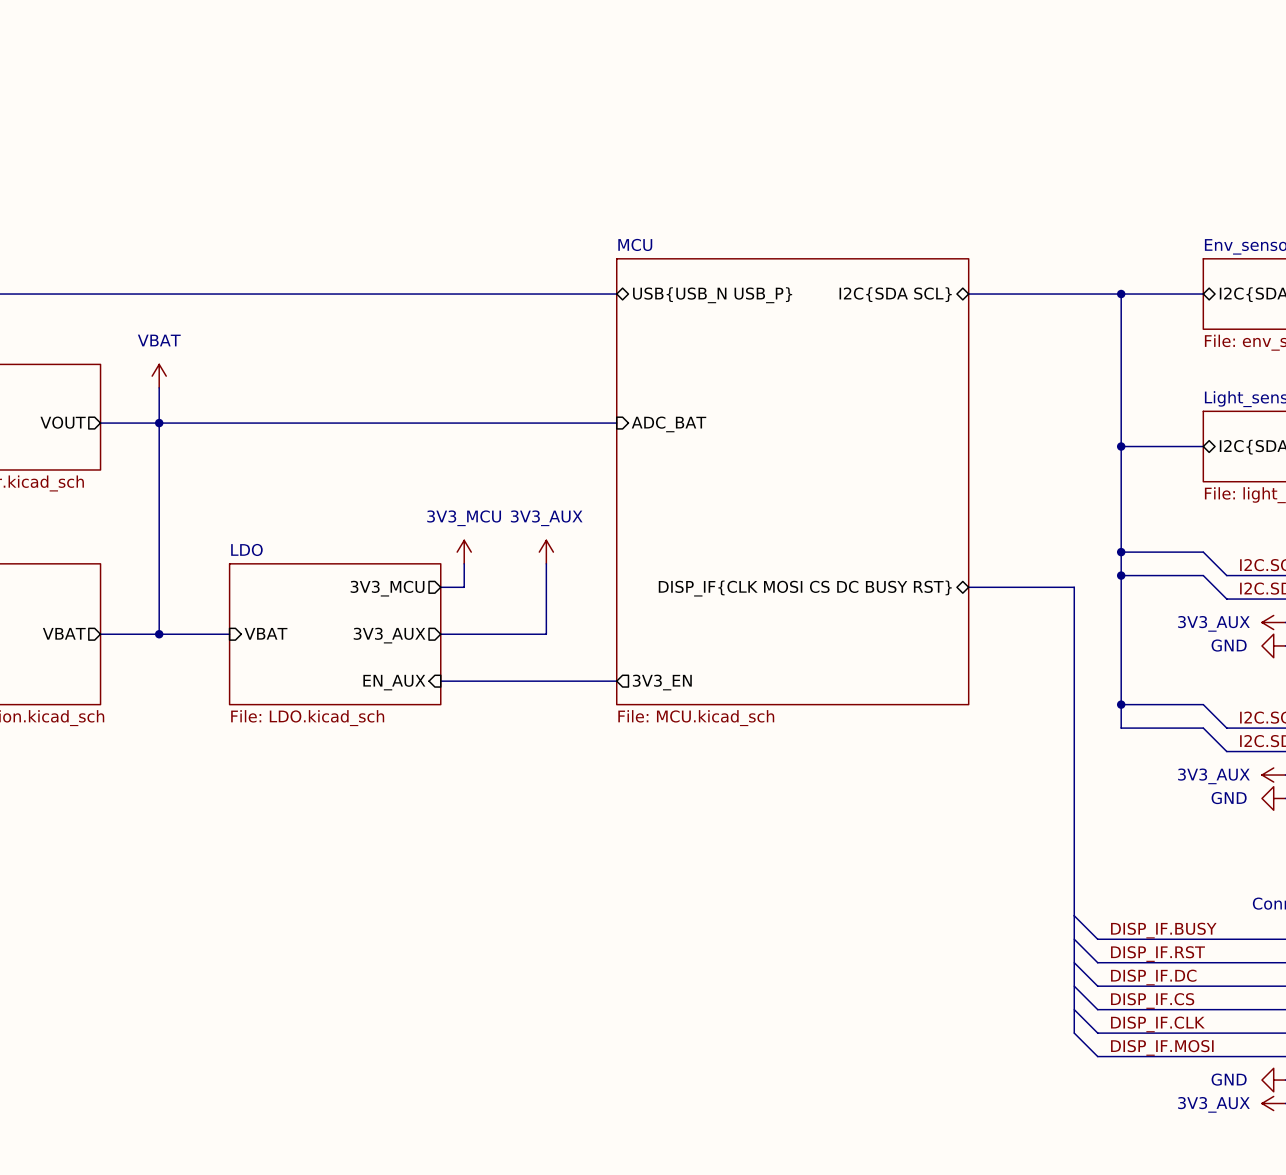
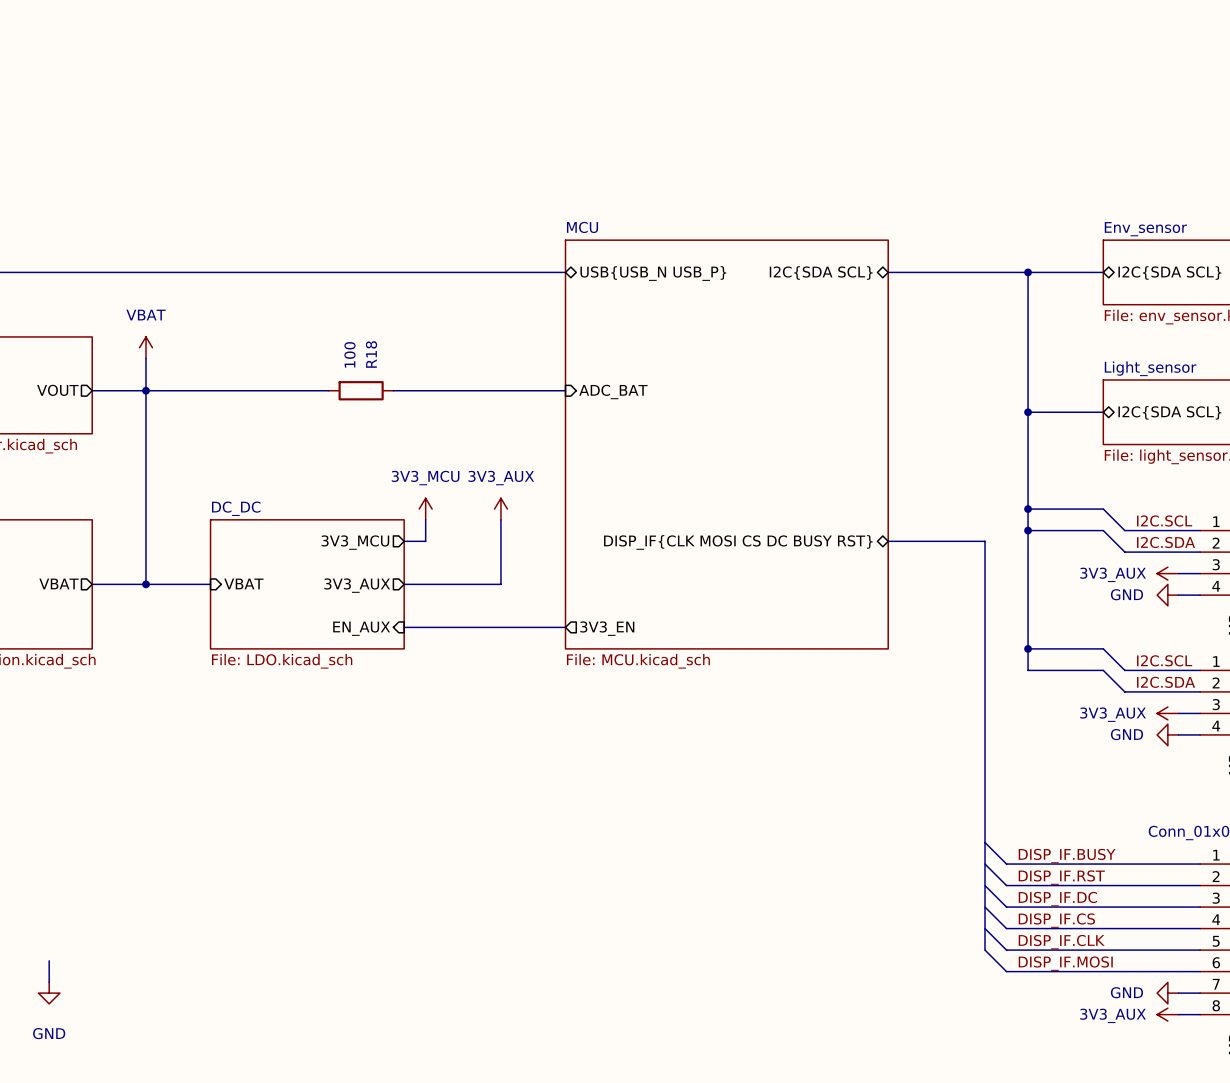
wire: (358, 423) (429, 423) -> none
R18: none -> 100 (361, 390)
sheet LDO name: LDO (246, 549) -> DC_DC (236, 508)
wire: none -> (49, 960) (49, 982)
power symbol: none -> GND (49, 993)

